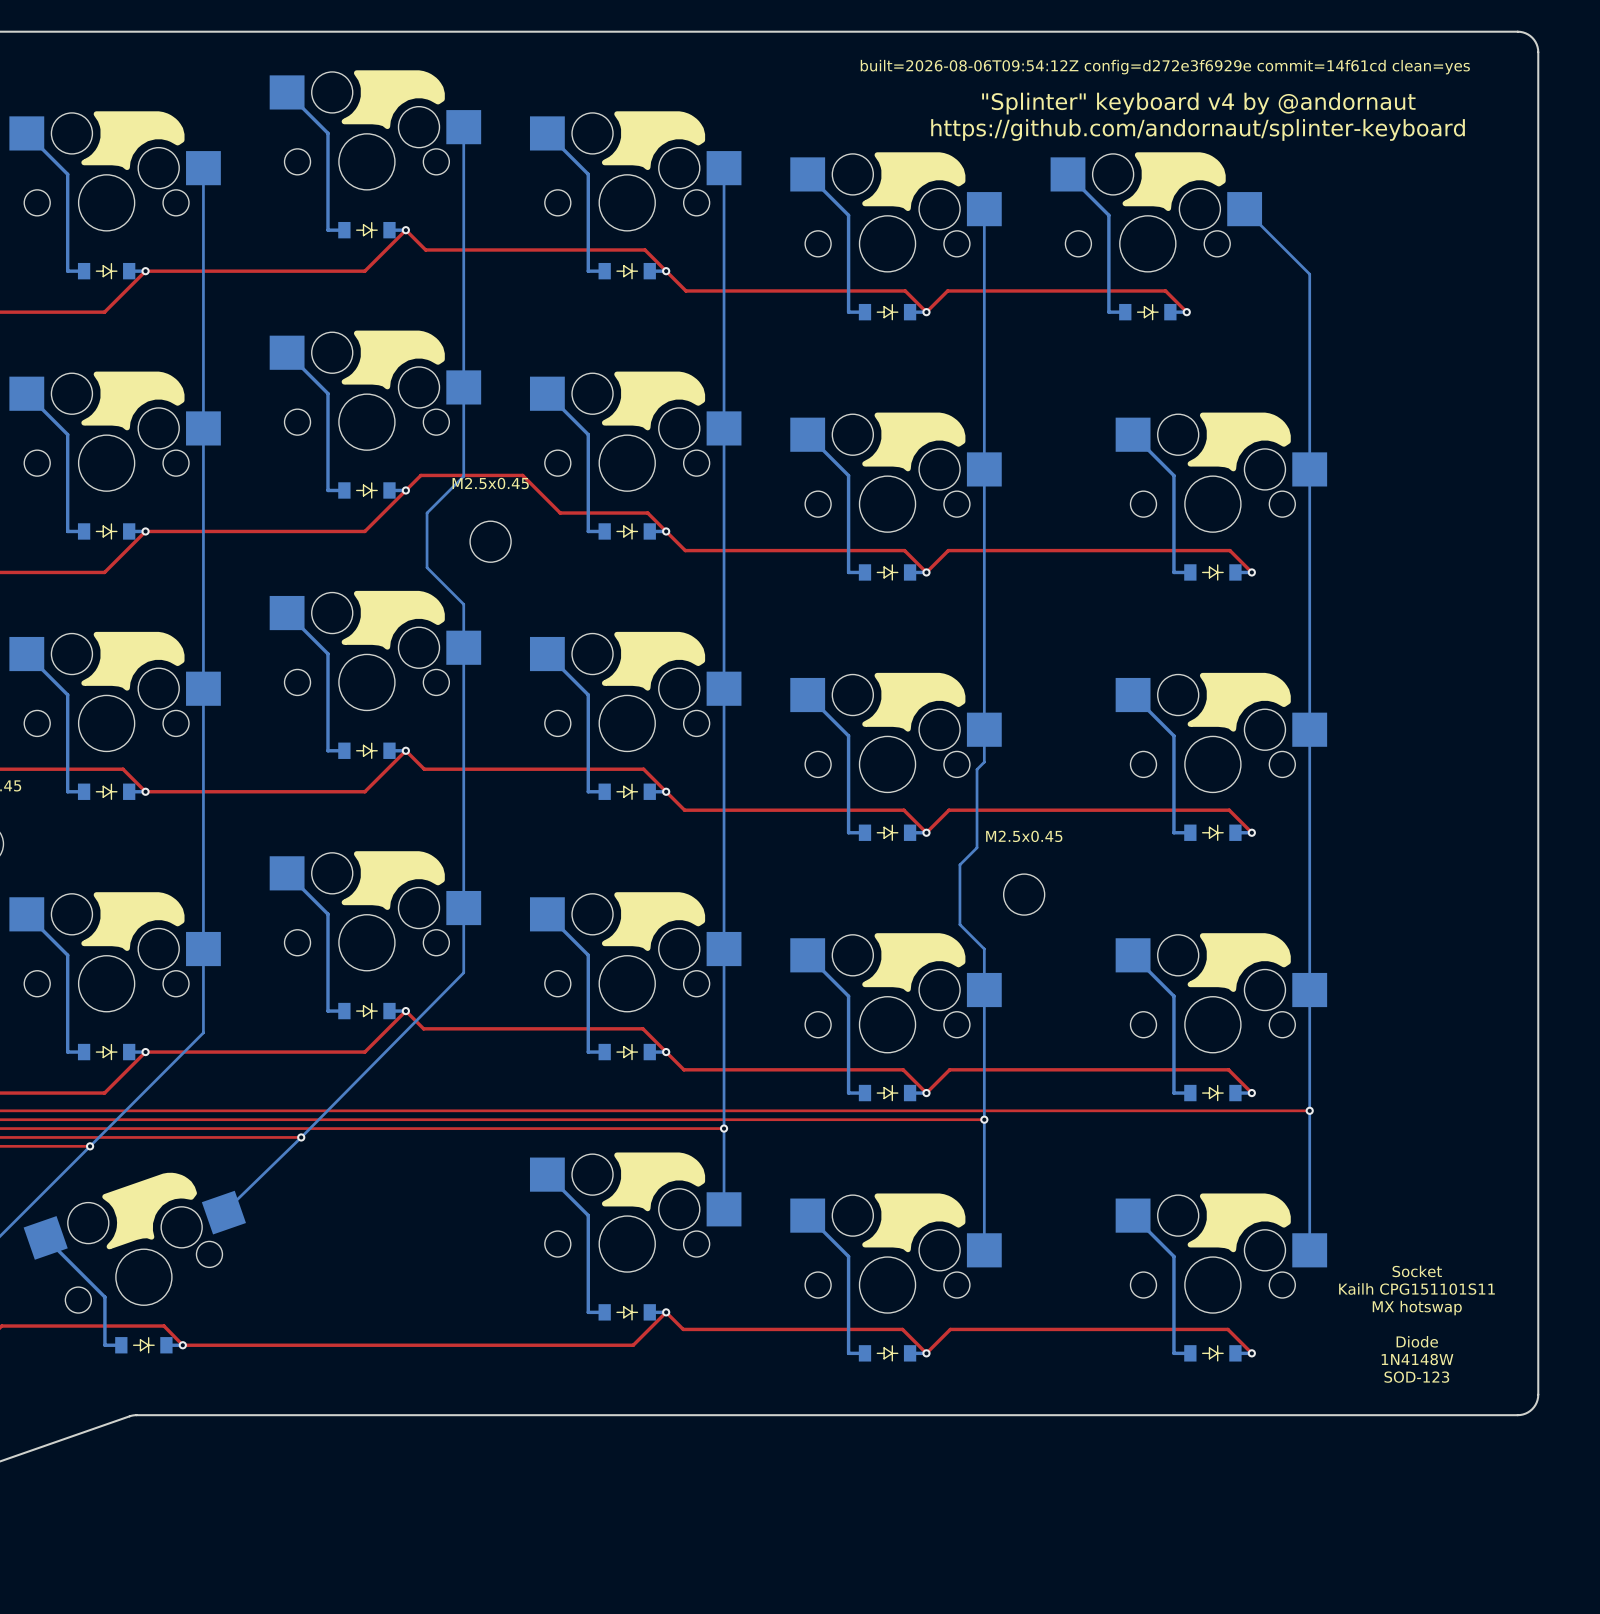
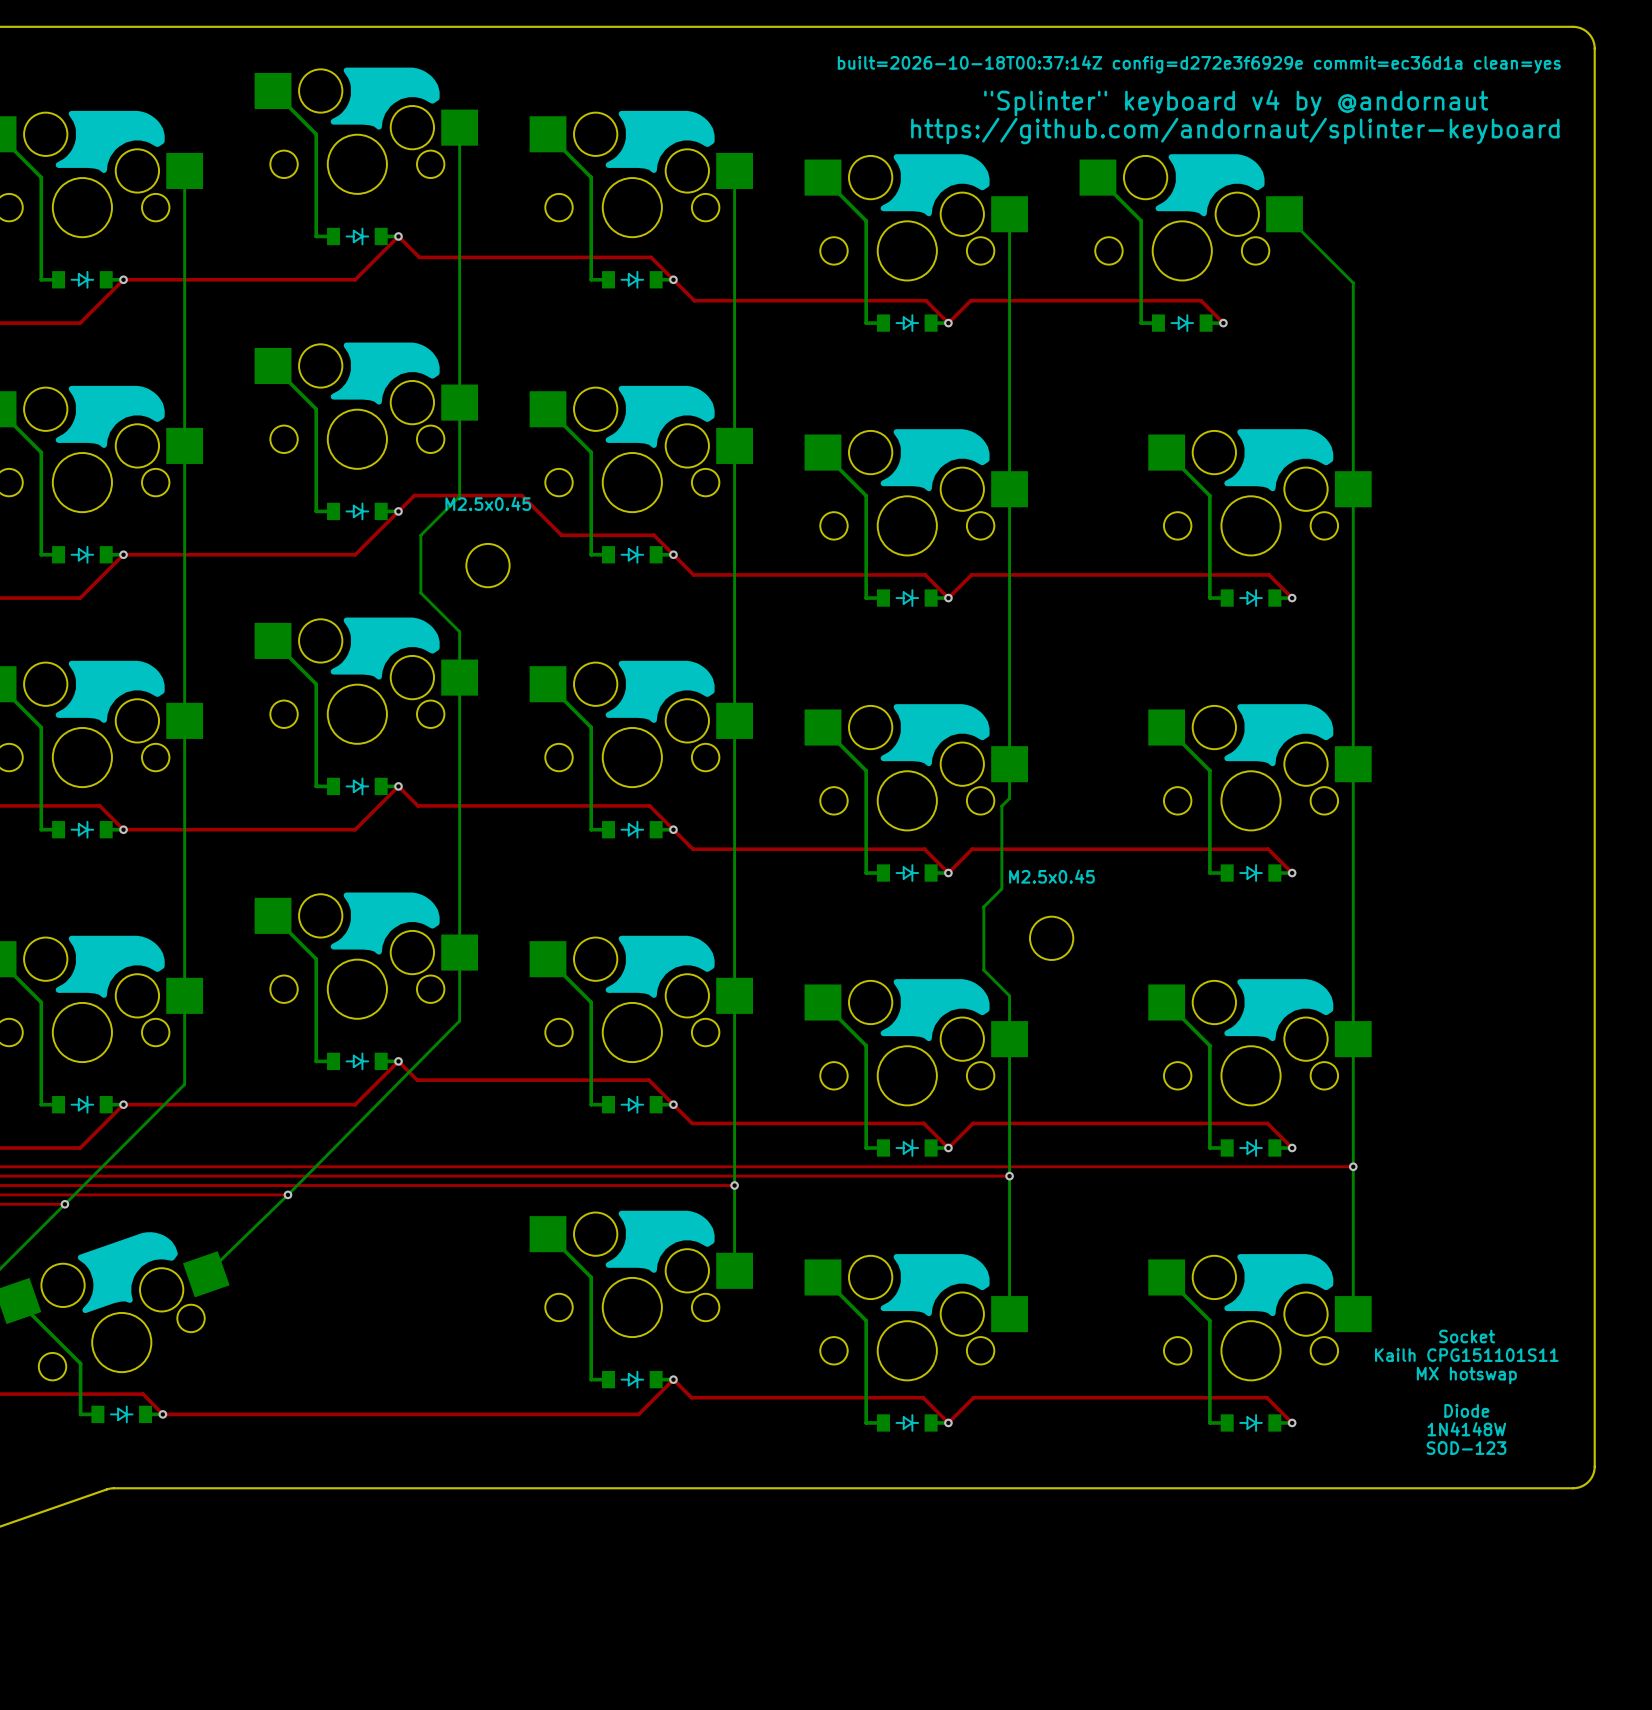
text: built=2026-08-06T09:54:12Z config=d272e3f6929e commit=14f61cd clean=yes (1165, 67) -> built=2026-10-18T00:37:14Z config=d272e3f6929e commit=ec36d1a clean=yes (1199, 64)

